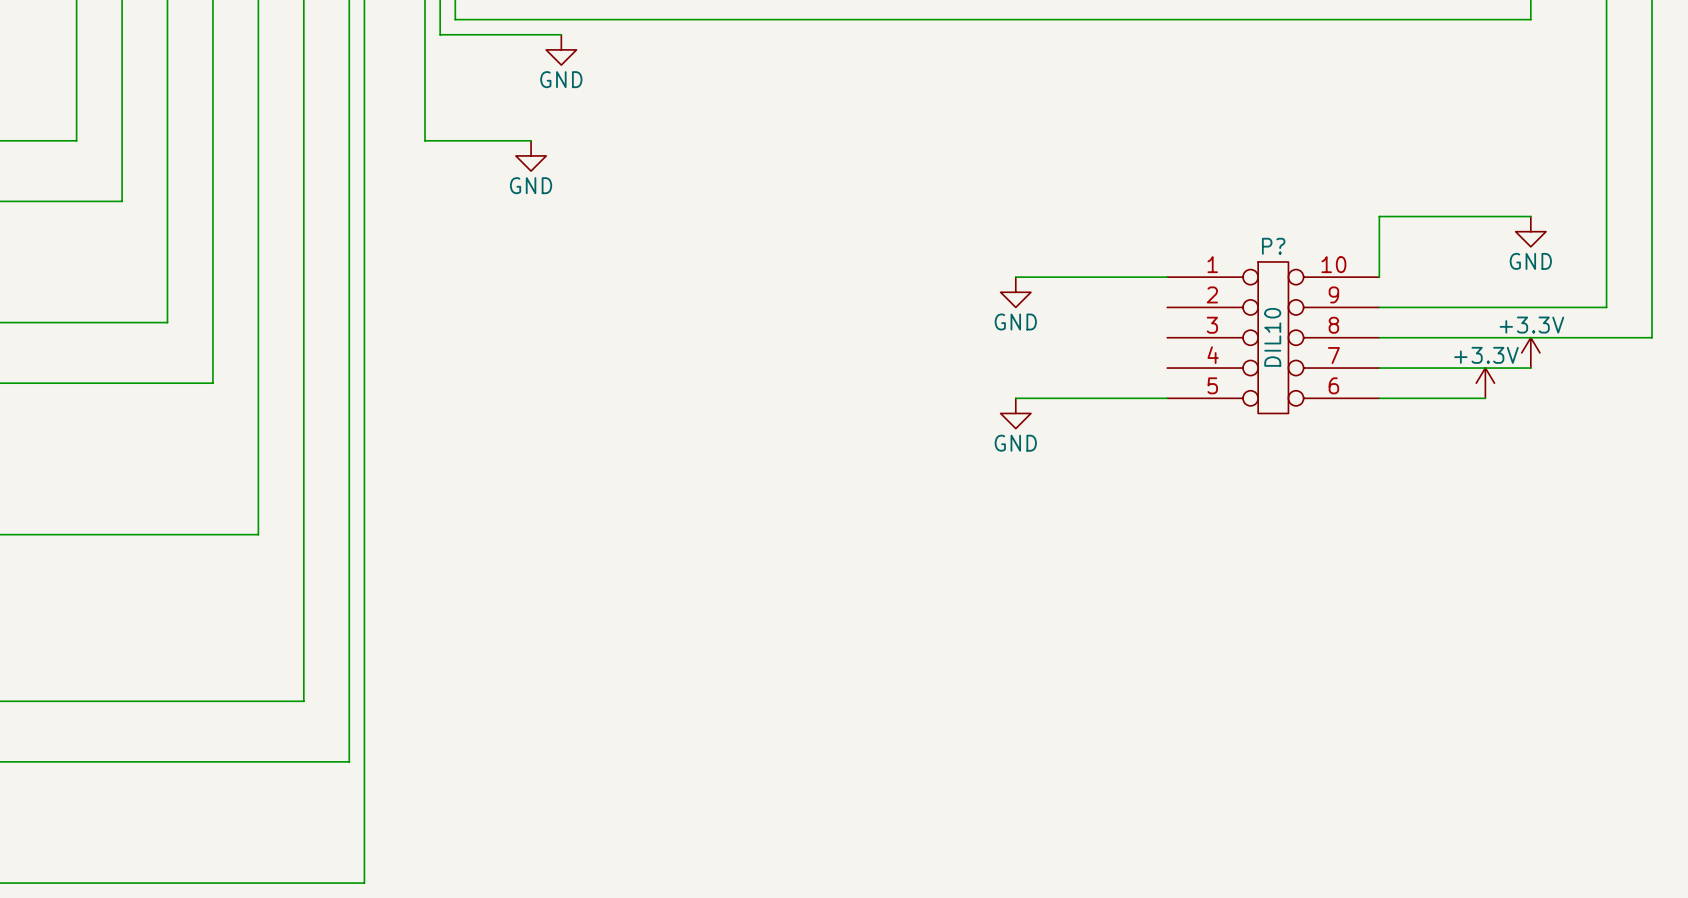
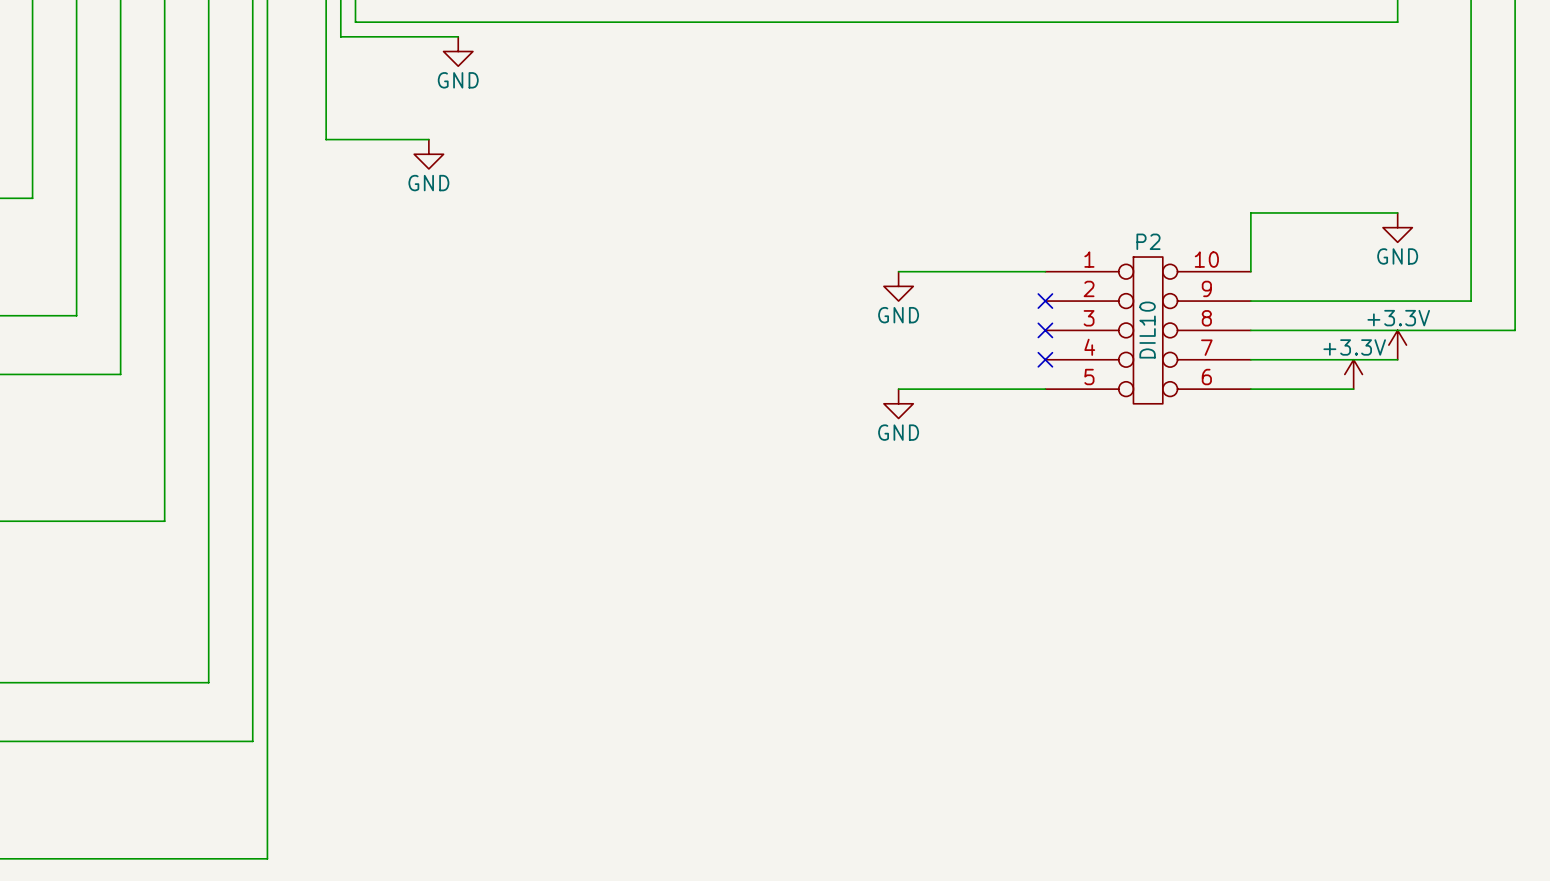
P? name: P? (1273, 246) -> P2 (1148, 241)
no-connect mark: none -> (1045, 301)
no-connect mark: none -> (1045, 330)
no-connect mark: none -> (1045, 359)

